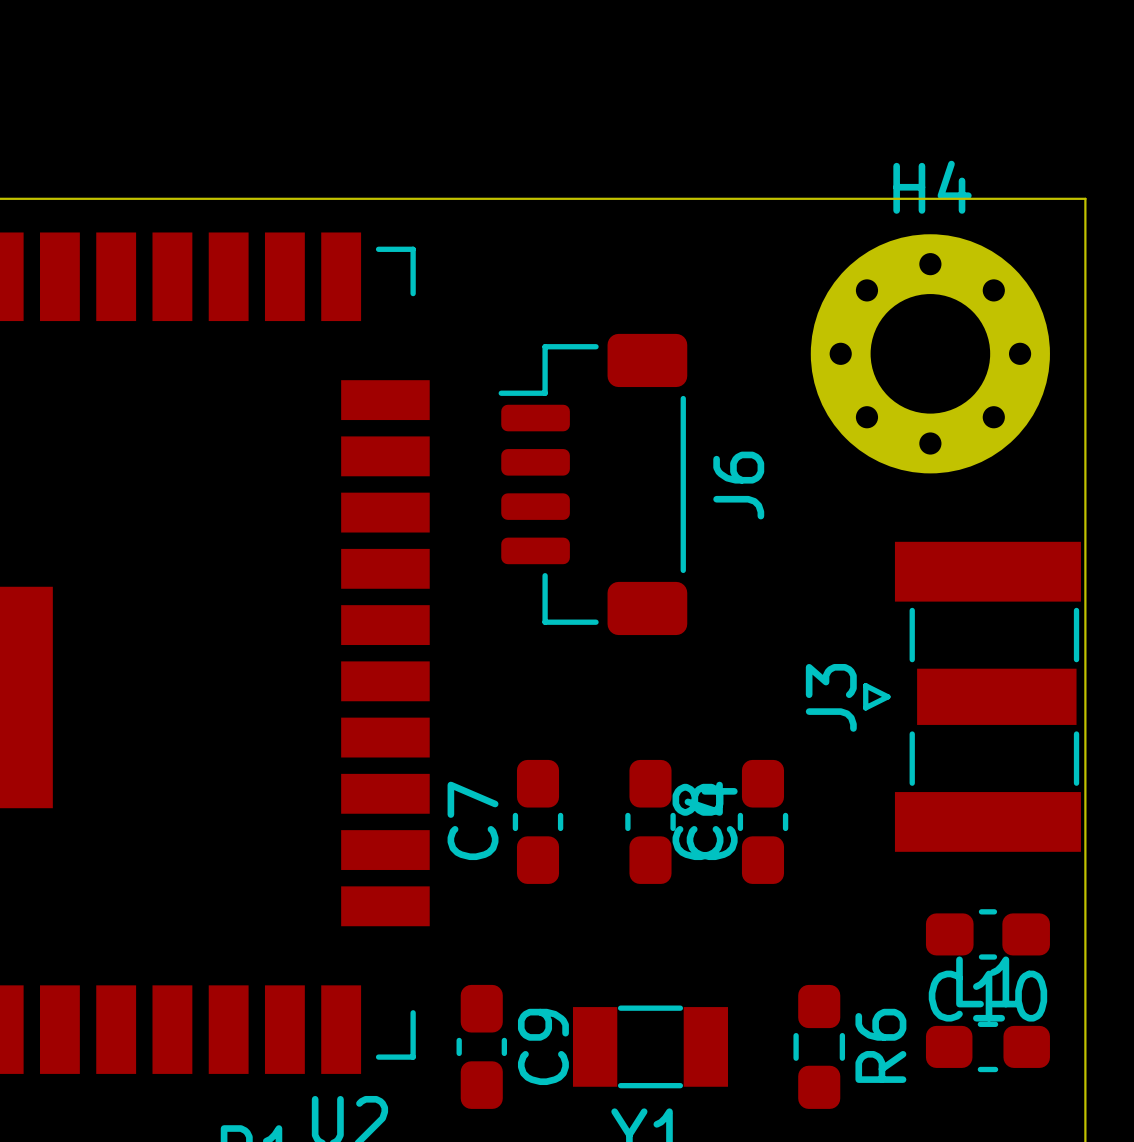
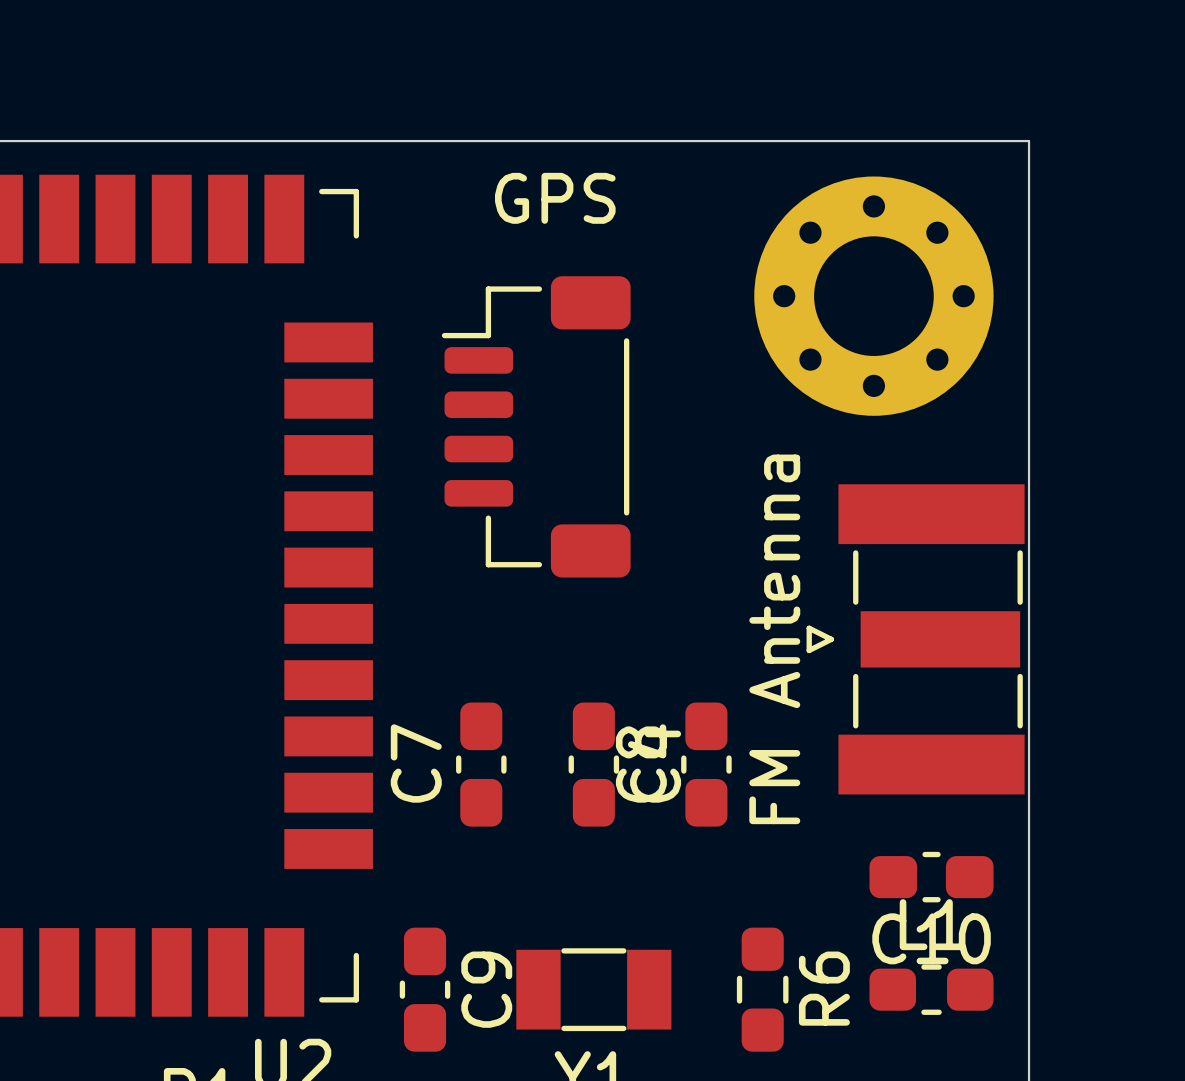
H4 name: H4 (932, 187) -> none
J6 name: J6 (738, 485) -> GPS (555, 198)
J3 name: J3 (831, 697) -> FM Antenna (774, 639)

